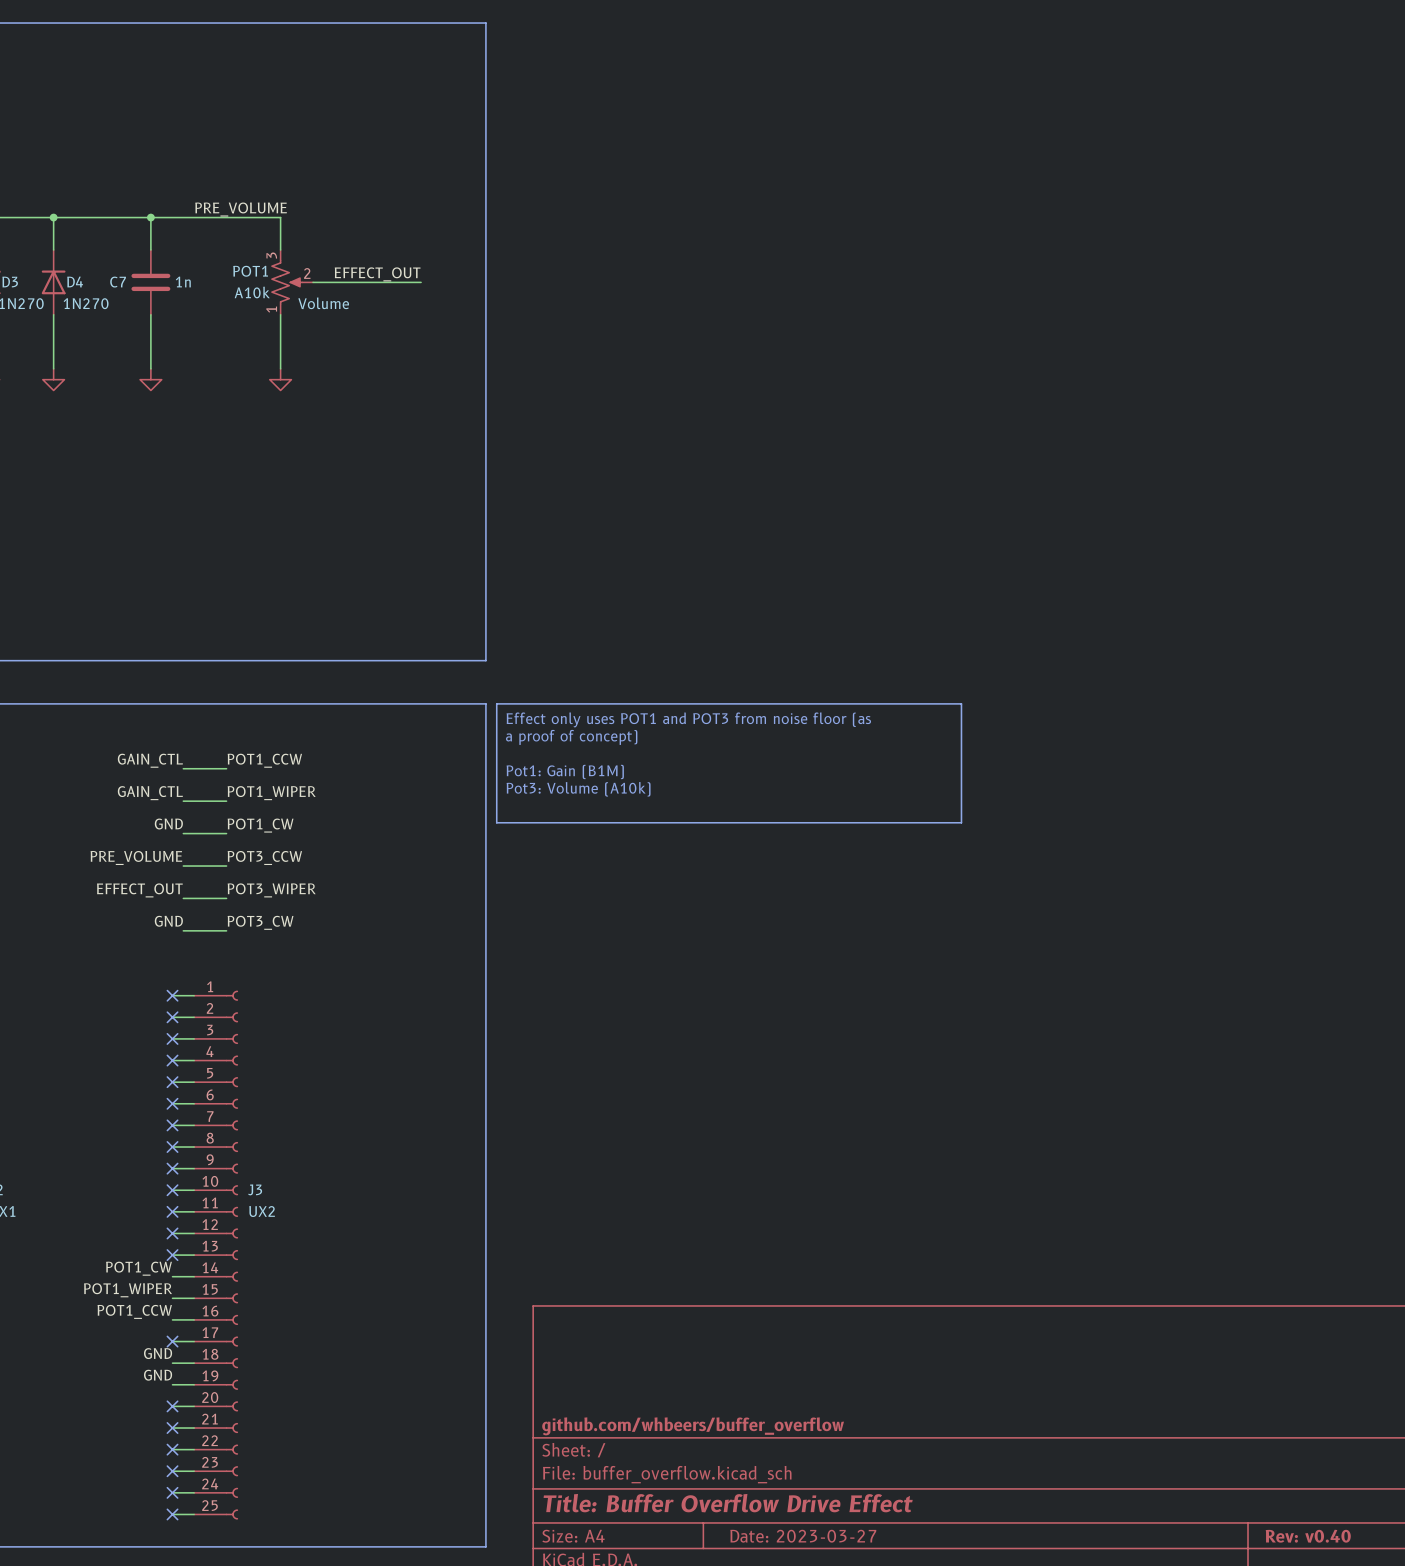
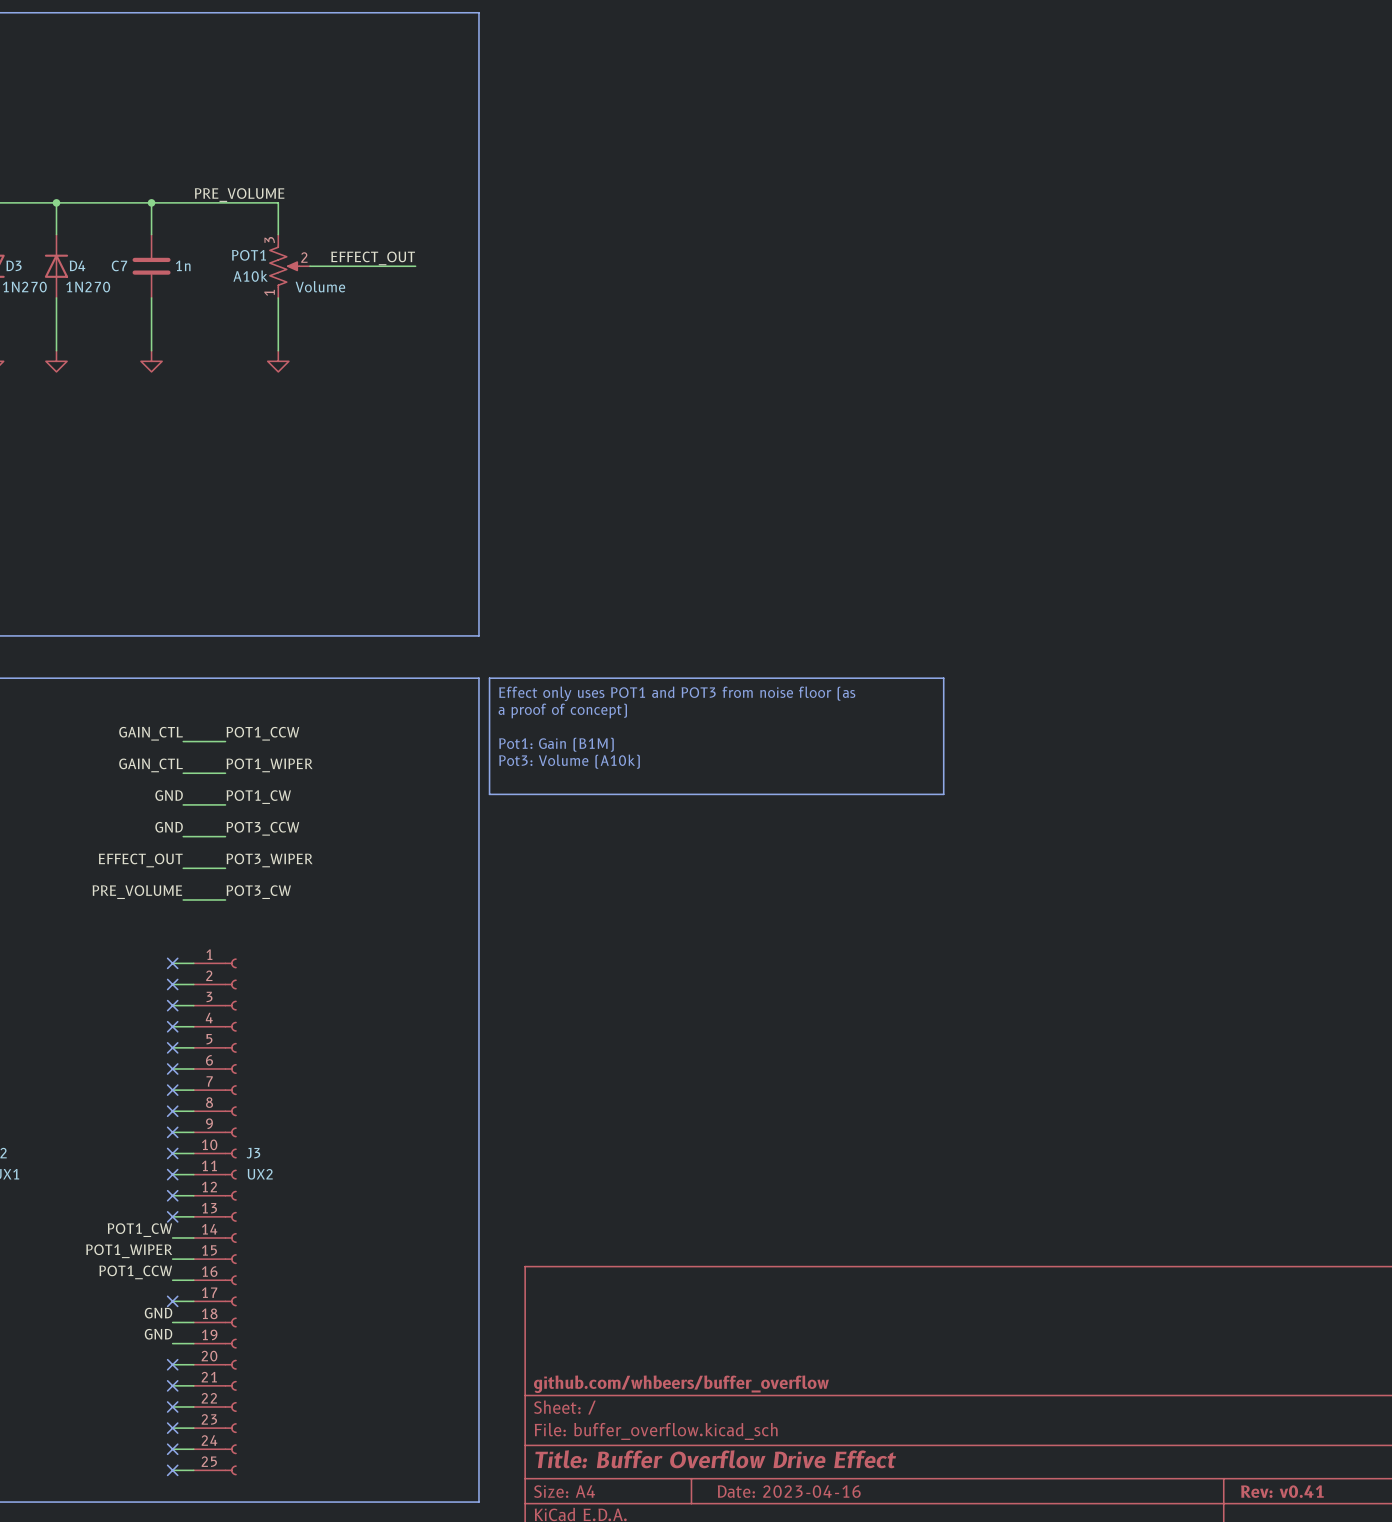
label: PRE_VOLUME (136, 857) -> GND (169, 827)
label: GND (168, 921) -> PRE_VOLUME (137, 892)
title block: Date: 2023-03-27 (803, 1536) -> Date: 2023-04-16 (789, 1491)
title block: Rev: v0.40 (1308, 1536) -> Rev: v0.41 (1282, 1491)

